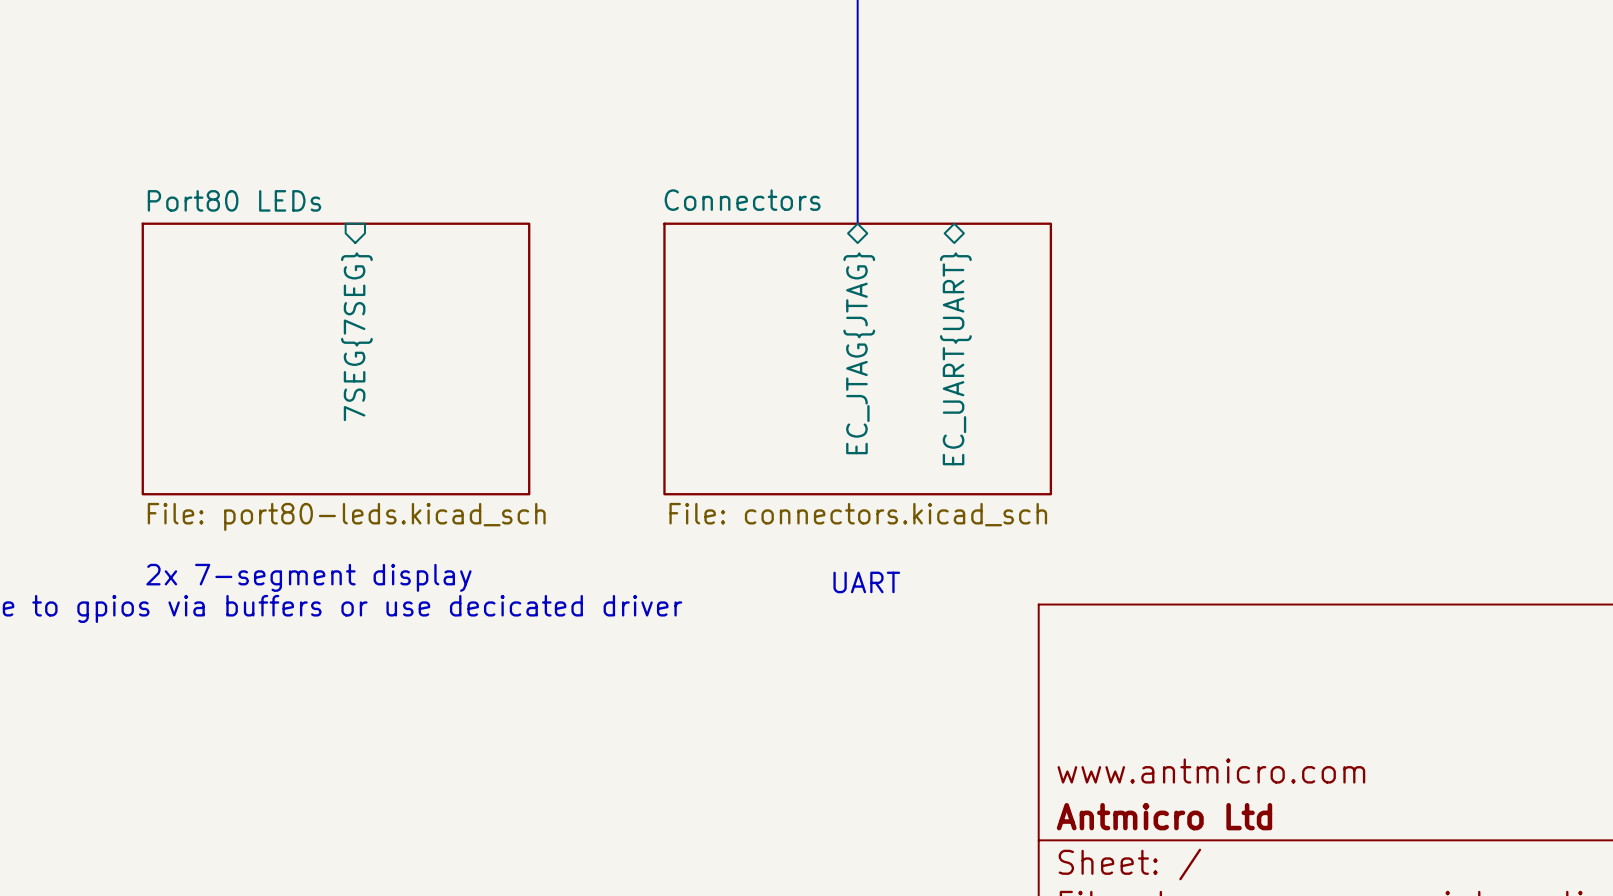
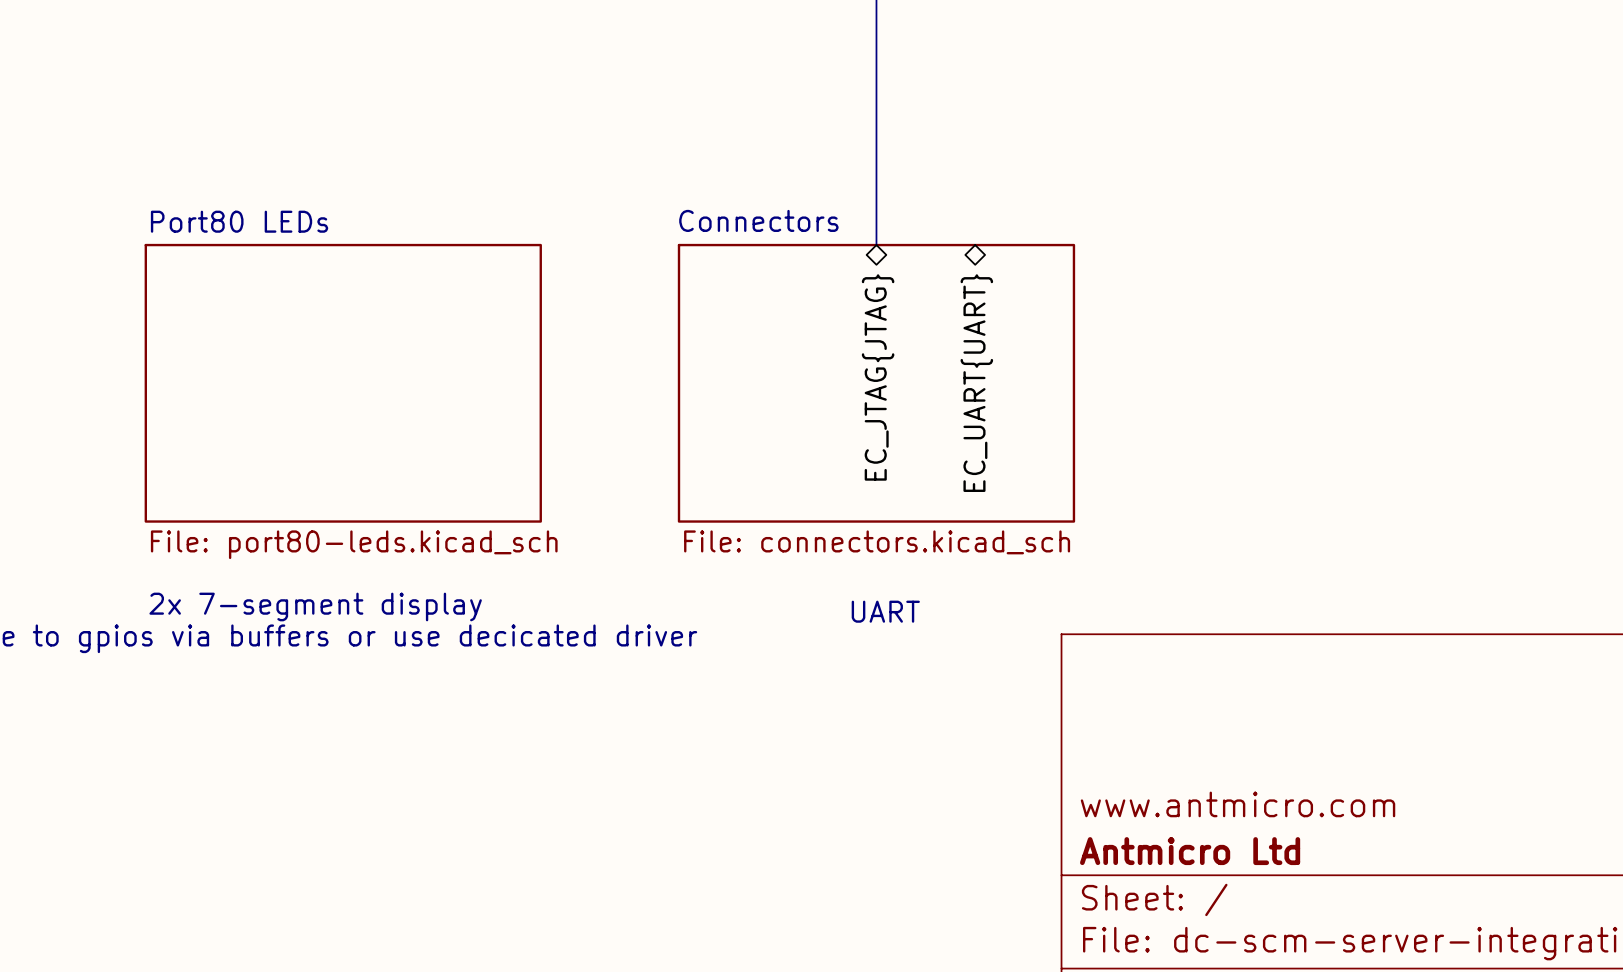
sheet pin: 7SEG{7SEG} (356, 336) -> none

